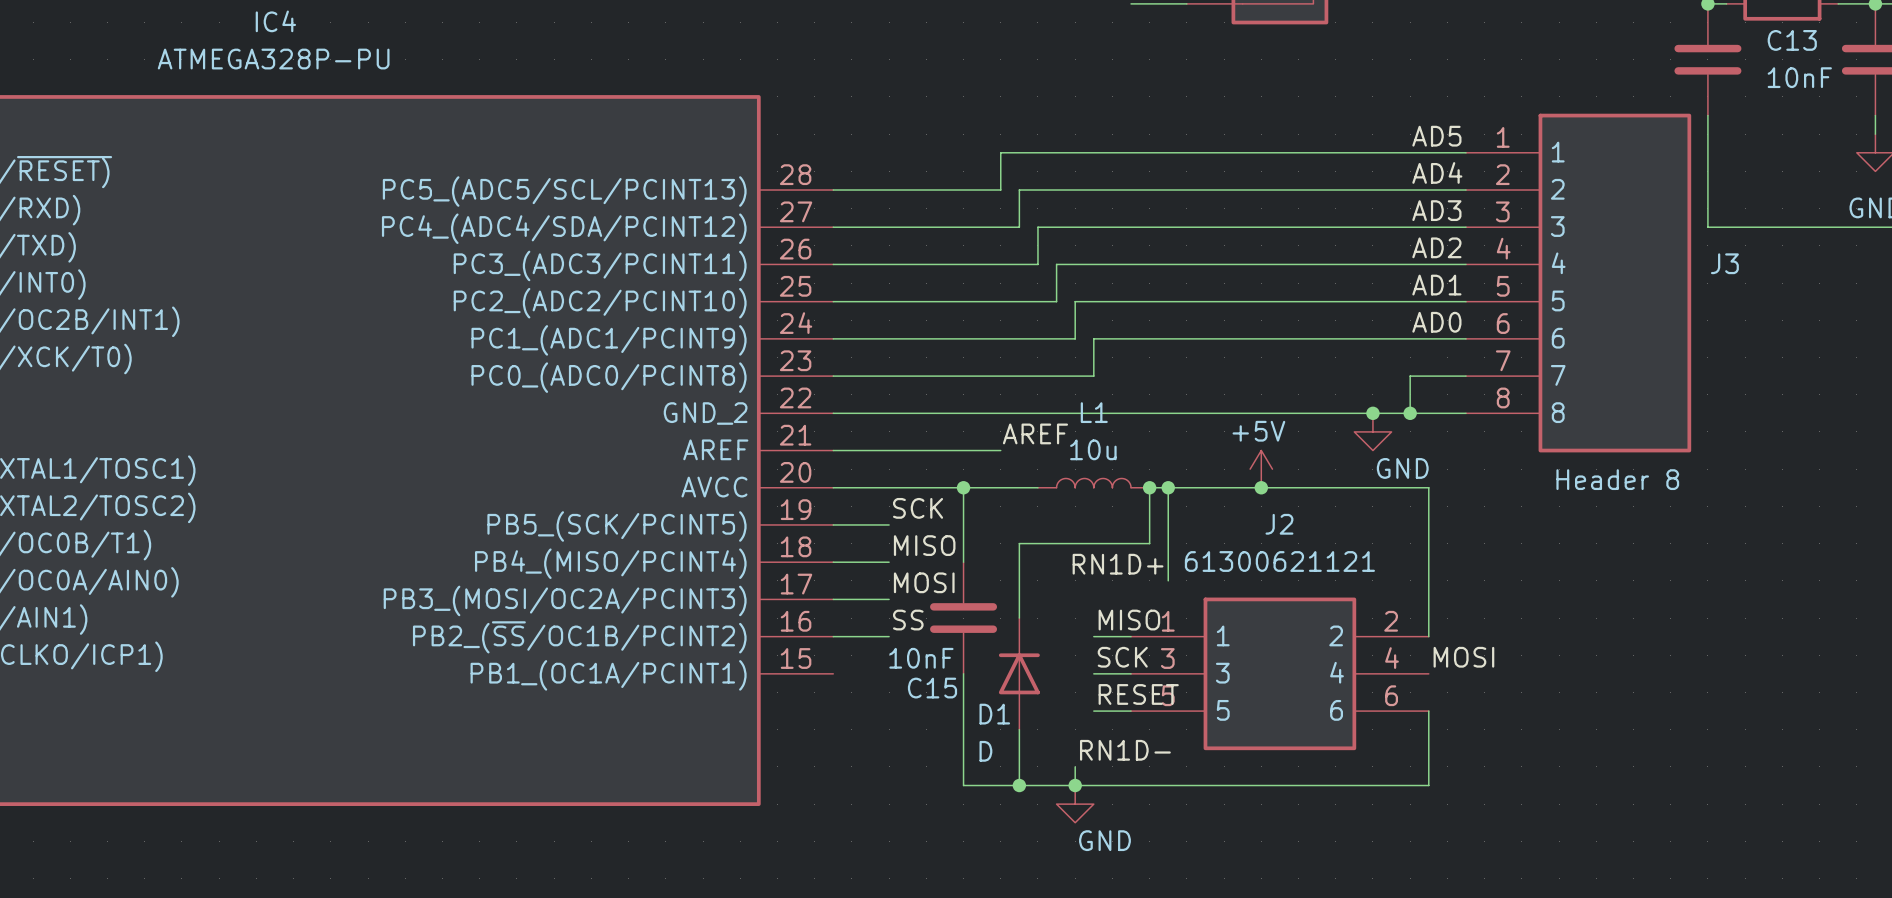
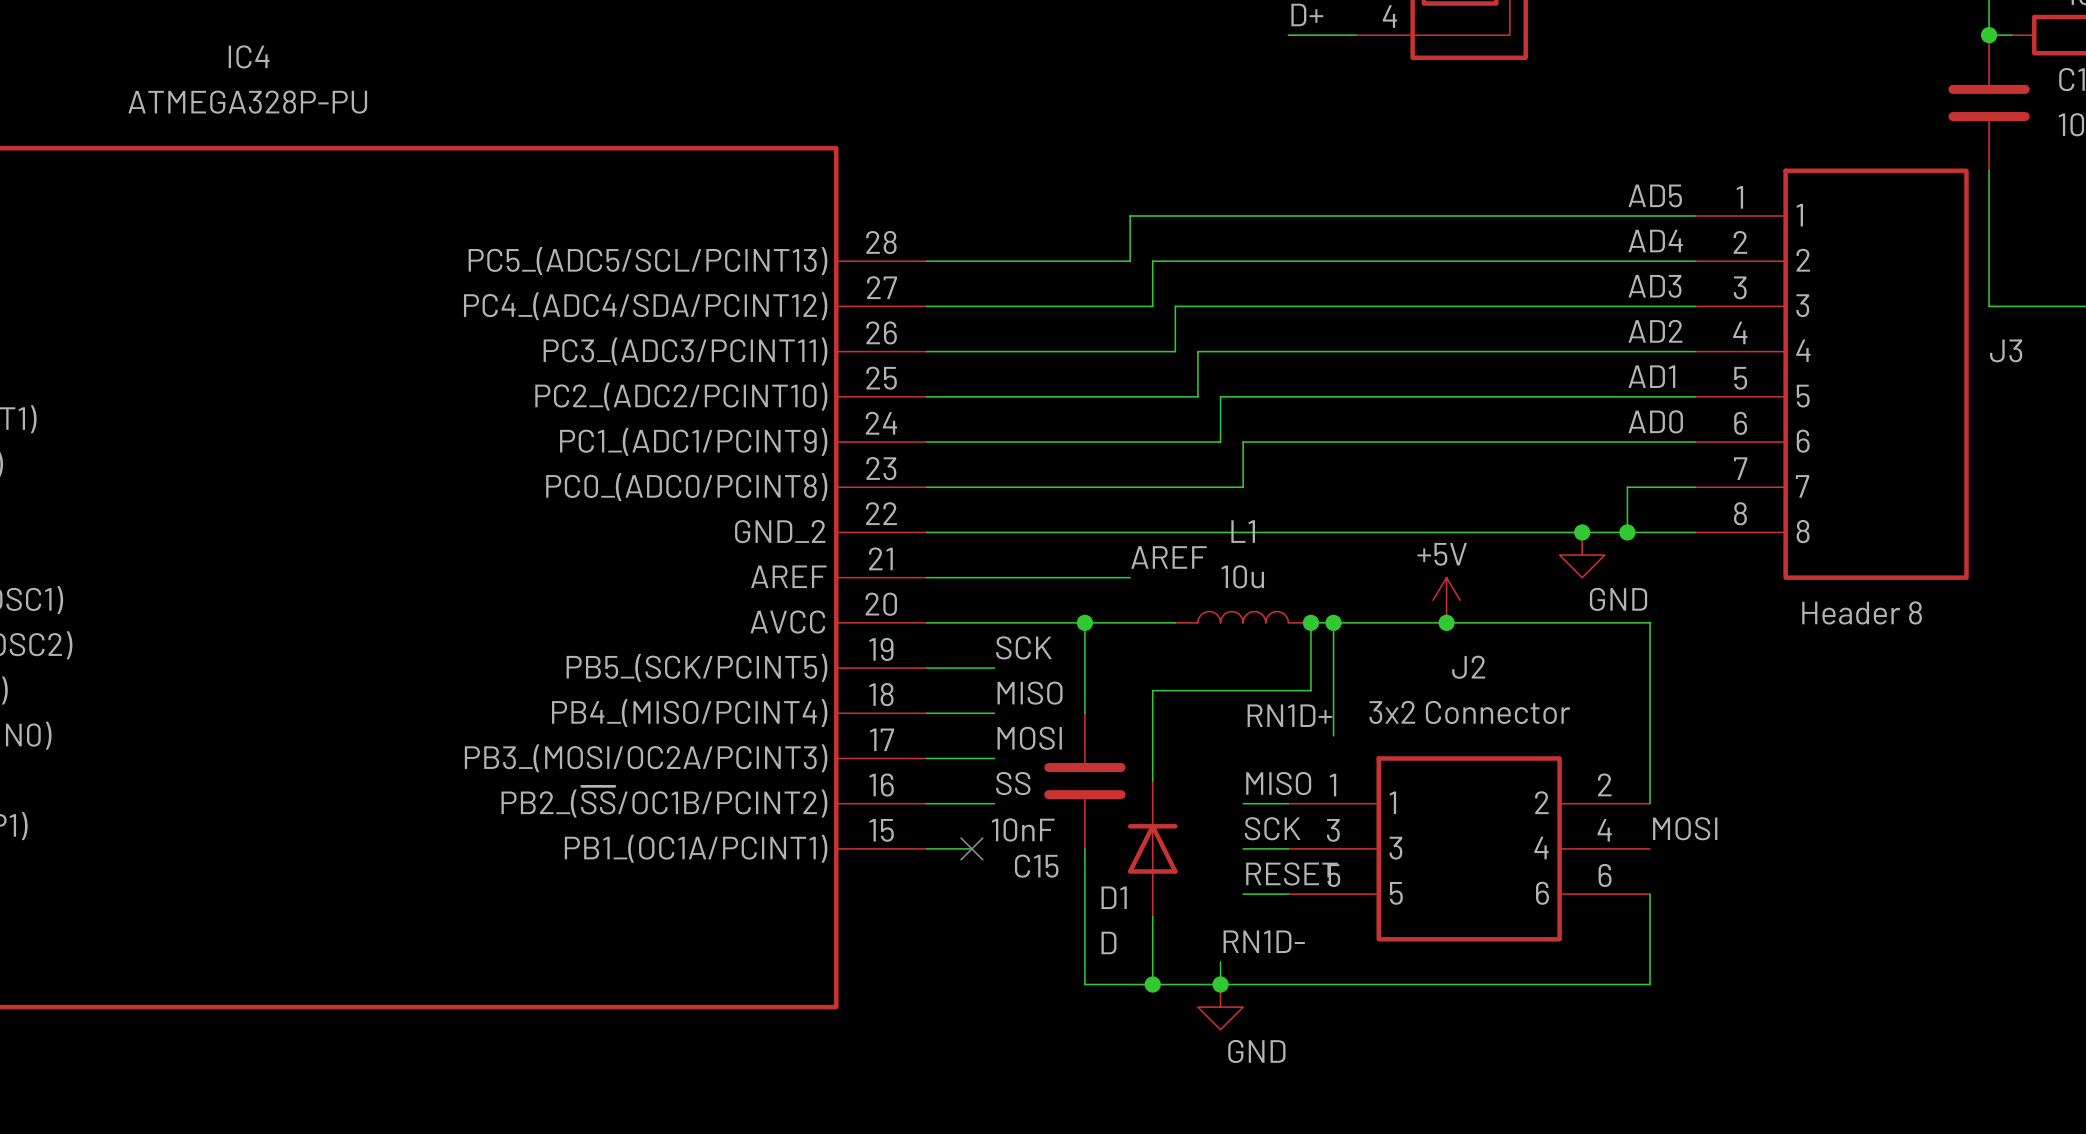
J2 value: 61300621121 (1279, 561) -> 3x2 Connector (1469, 712)
wire: none -> (926, 848) (971, 848)
no-connect mark: none -> (971, 848)

